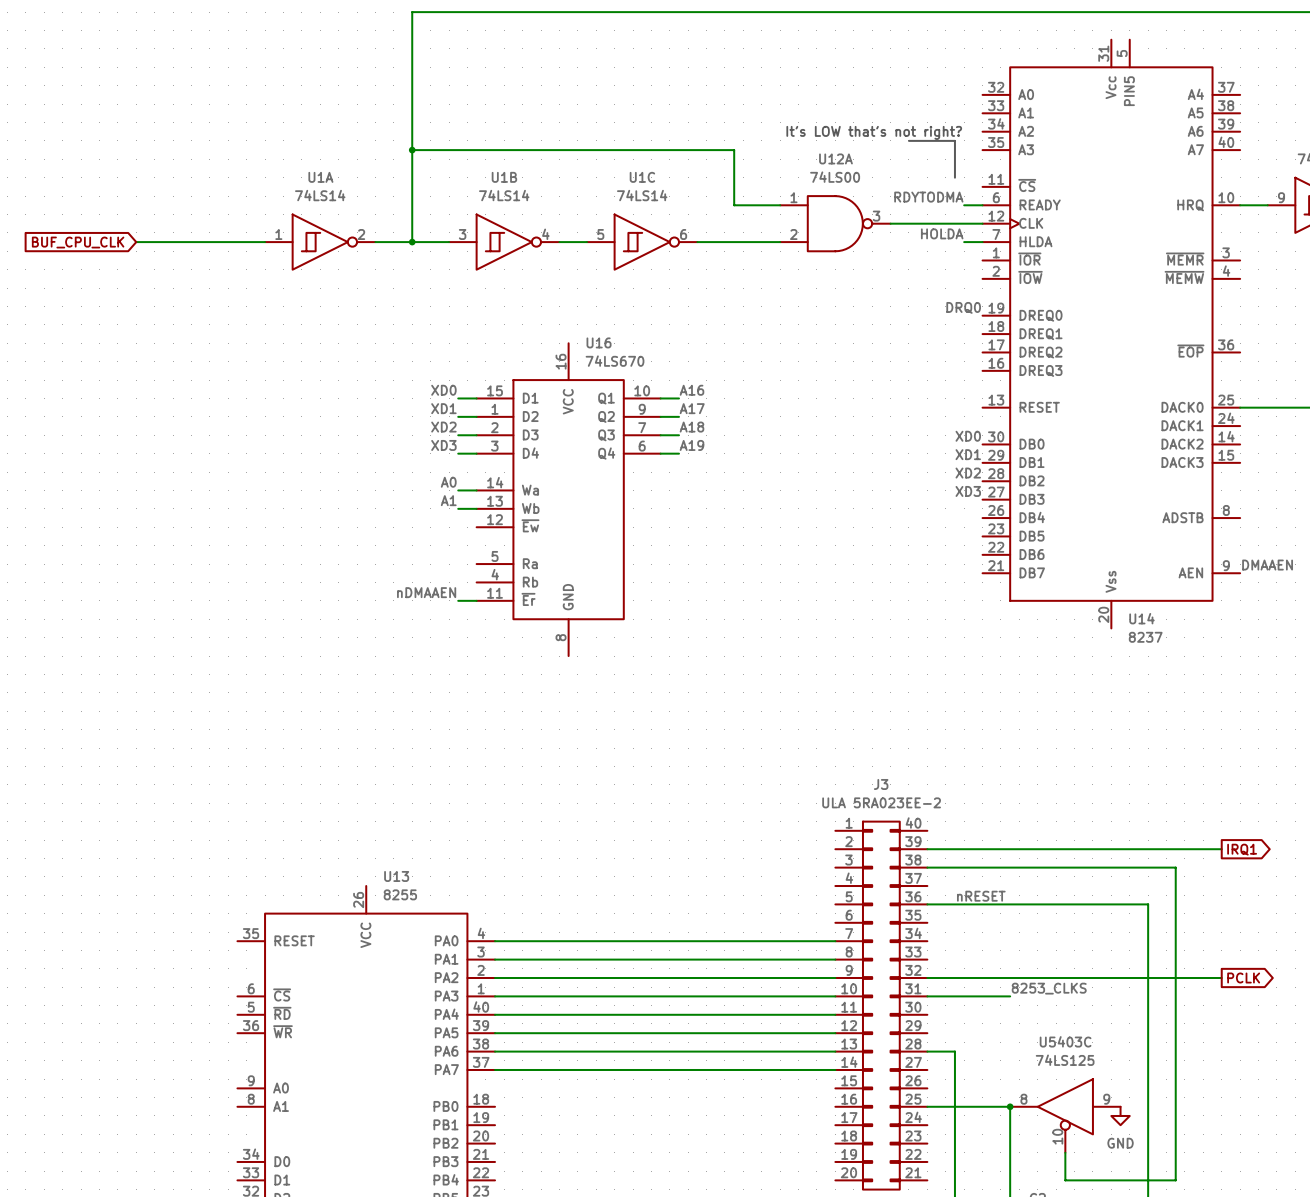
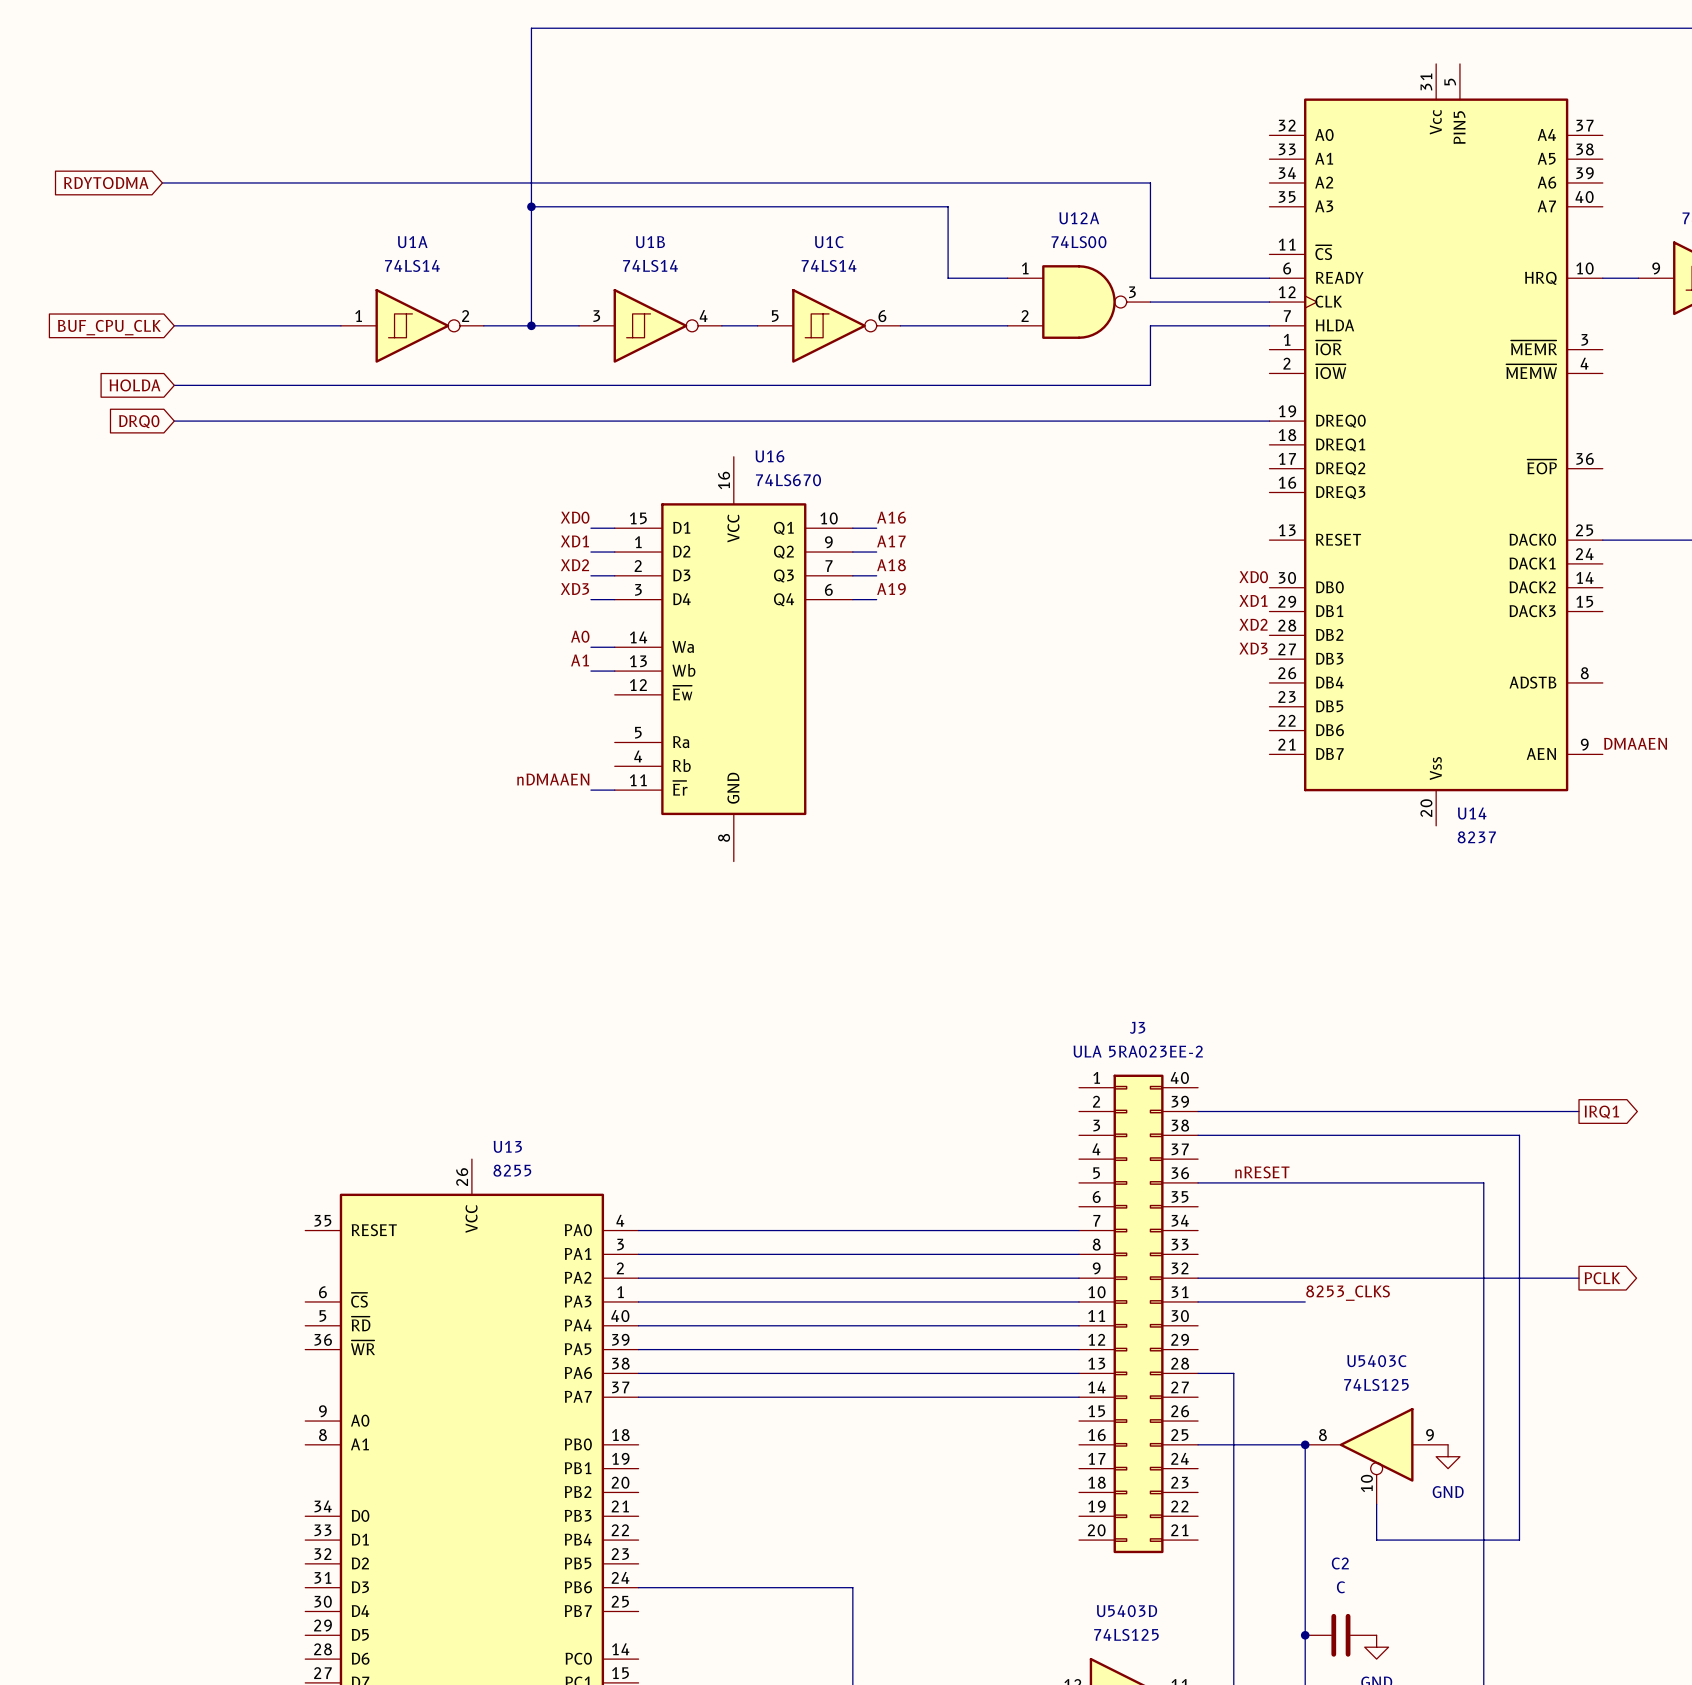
global label: none -> RDYTODMA (106, 183)
wire: none -> (162, 182) (1150, 182) (1150, 278) (1245, 278)
text: It's LOW that's not right? (874, 132) -> none
line: (908, 140) (954, 140) (954, 177) -> none
label: RDYTODMA (928, 197) -> none
label: HOLDA (942, 233) -> none
wire: none -> (1245, 325) (1150, 325) (1150, 385) (174, 385)
global label: none -> HOLDA (135, 385)
label: DRQ0 (963, 307) -> none
wire: none -> (174, 421) (1269, 421)
global label: none -> DRQ0 (139, 421)

